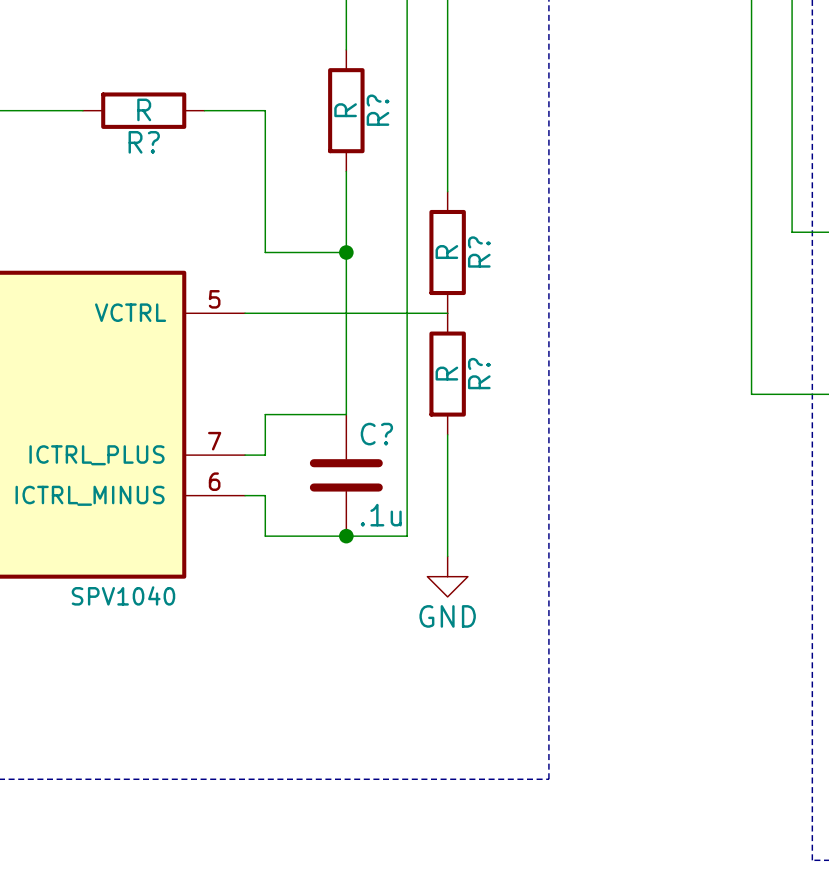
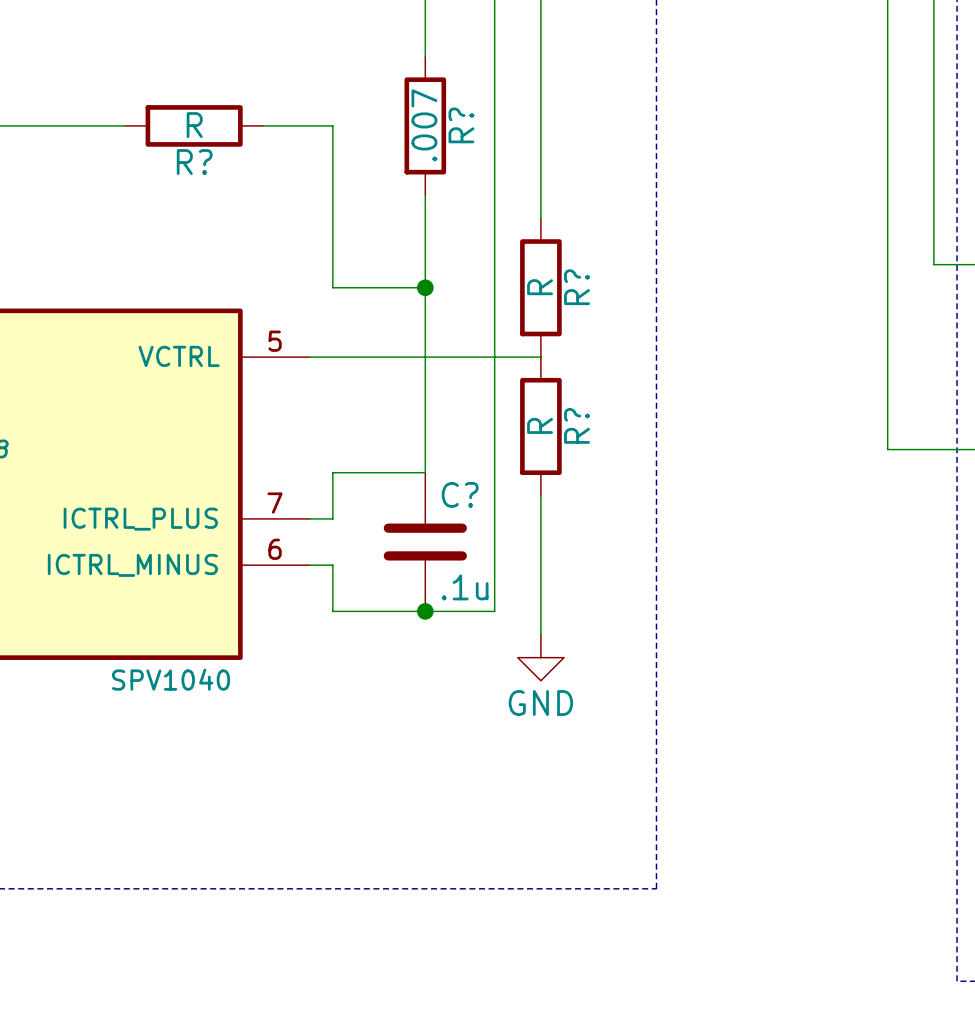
R? value: R (345, 110) -> .007 (424, 125)

